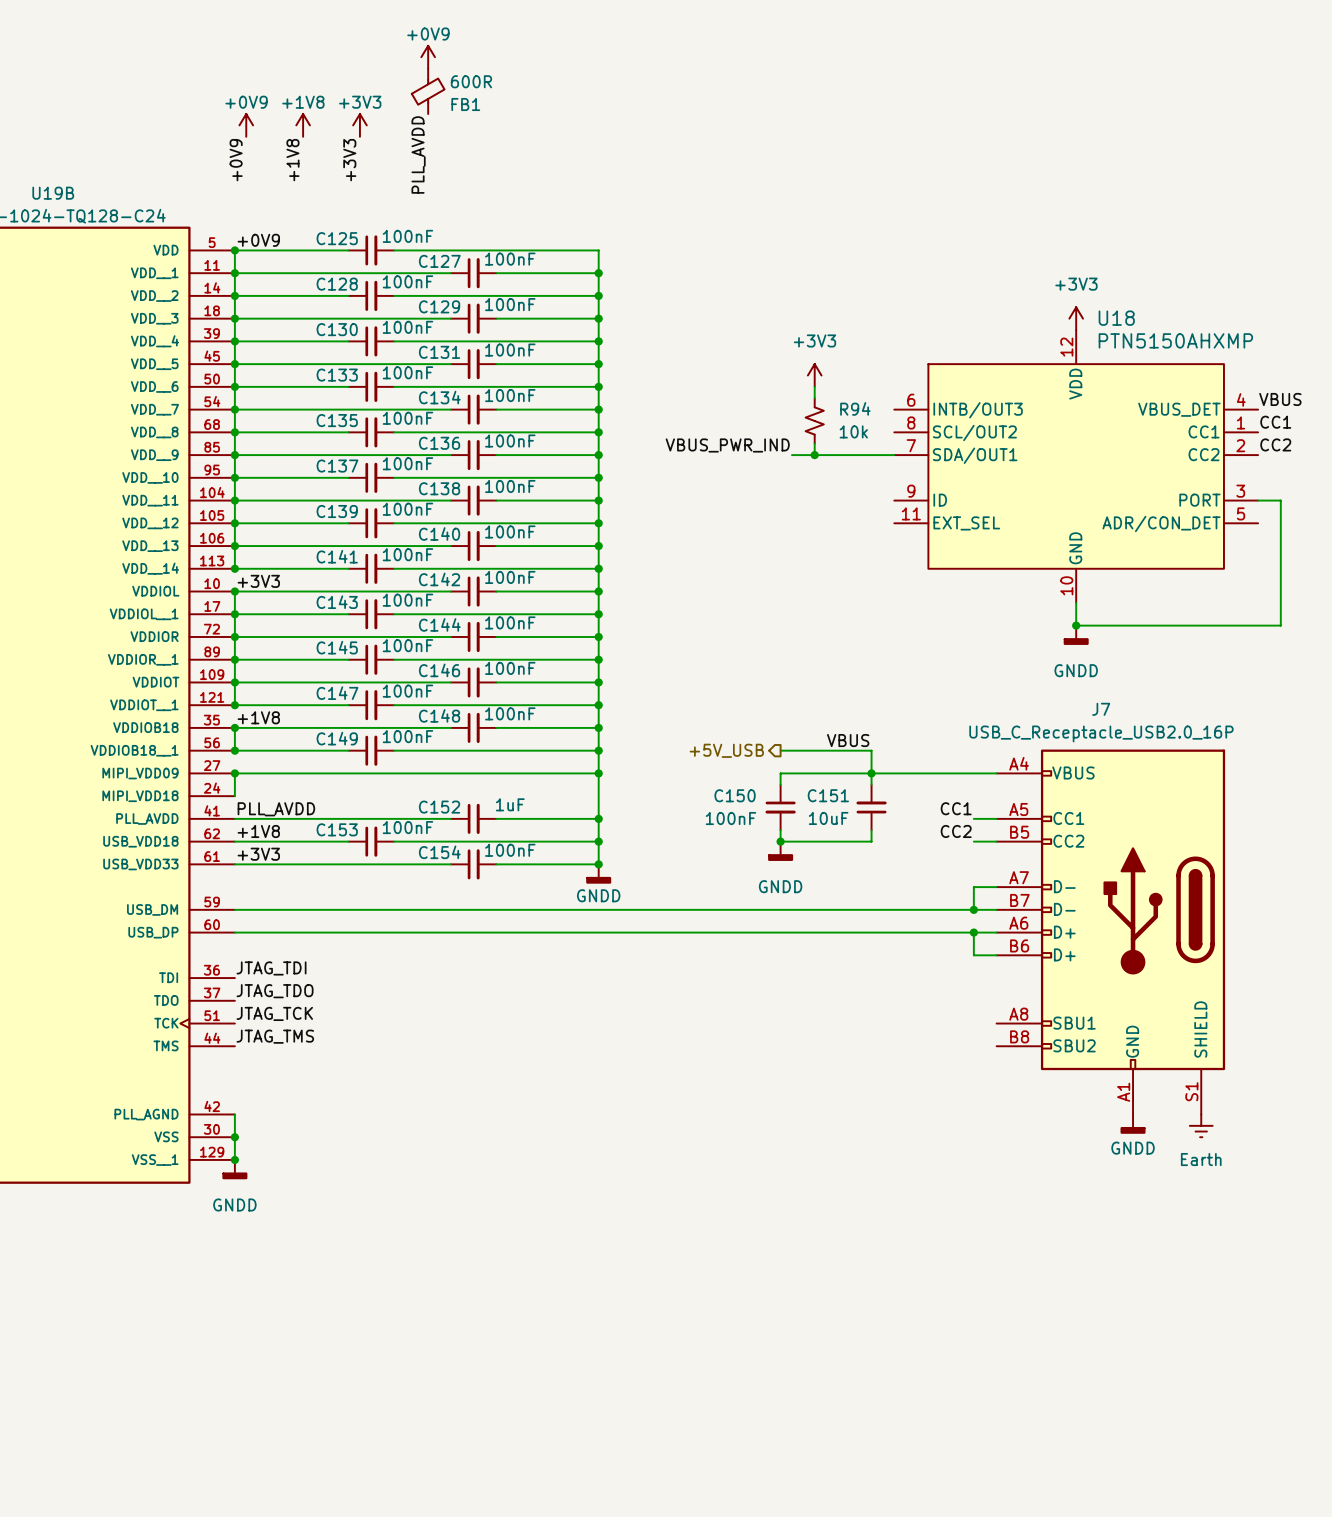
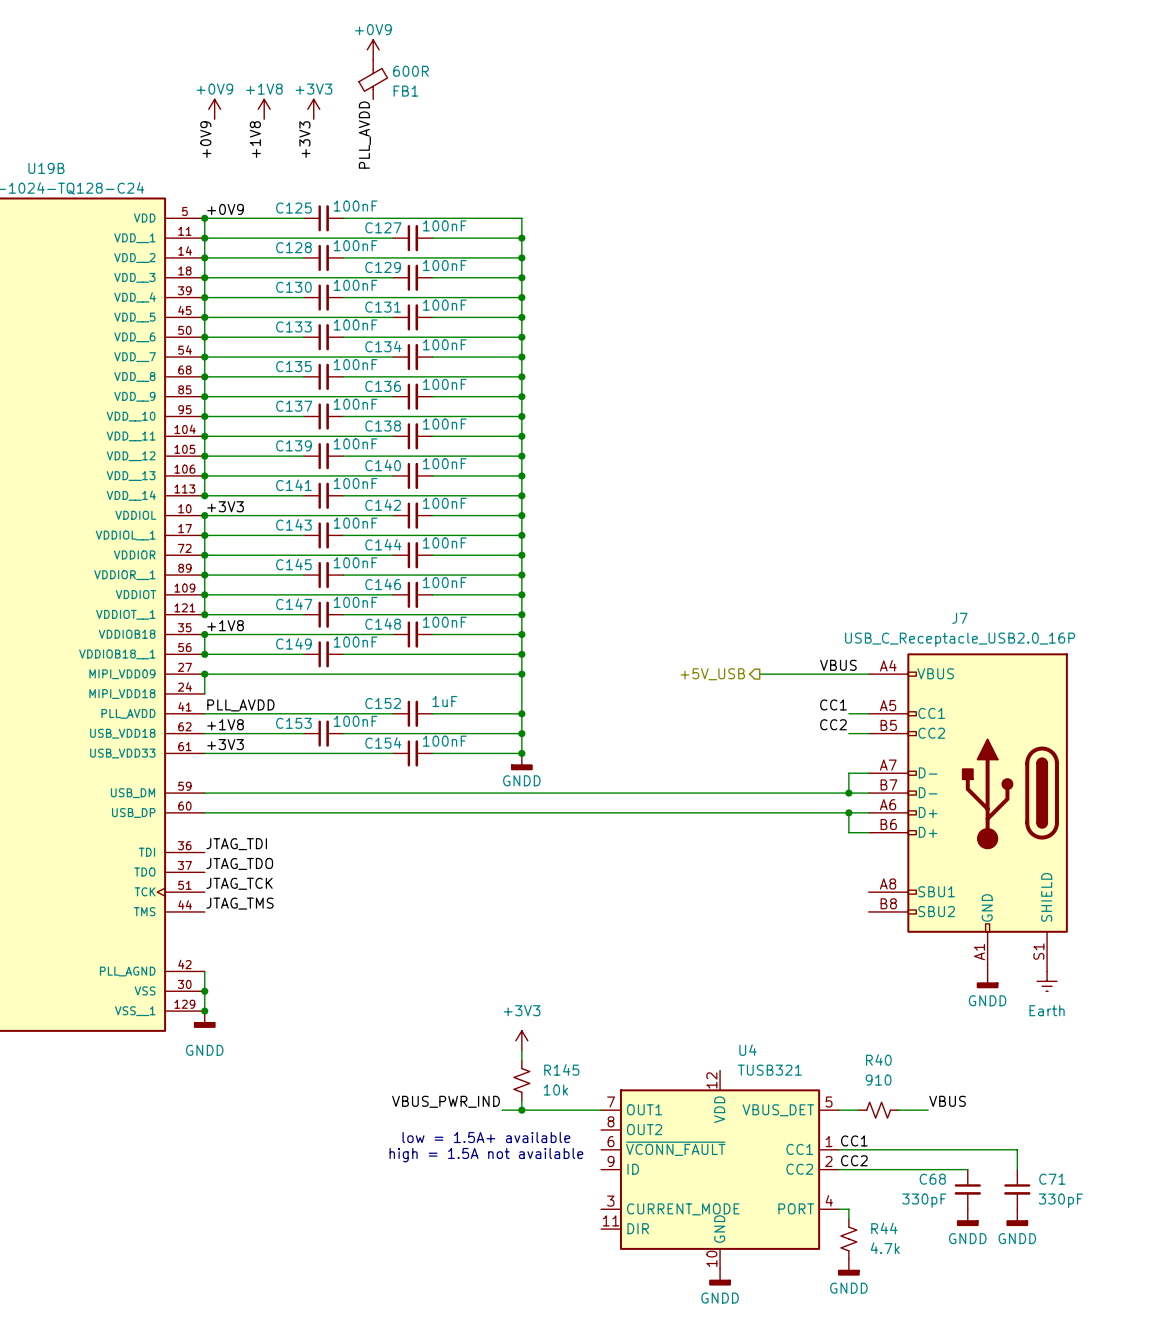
power symbol: +3V3 (1076, 318) -> none
power symbol: +3V3 (814, 375) -> none
wire: (814, 386) (814, 398) -> none
label: VBUS (1280, 399) -> none
R94: 10k (814, 420) -> none
label: CC1 (1275, 422) -> none
wire: (814, 443) (814, 455) -> none
label: CC2 (1275, 444) -> none
label: VBUS_PWR_IND (727, 445) -> none
wire: (791, 455) (894, 455) -> none
junction: (814, 455) -> none
U18: PTN5150AHXMP (1076, 466) -> none
wire: (1258, 500) (1280, 500) (1280, 625) (1076, 625) (1076, 602) -> none
junction: (1076, 625) -> none
power symbol: GNDD (1076, 635) -> none
label position: VBUS (848, 740) -> VBUS (838, 665)
hierarchical label position: +5V_USB (726, 750) -> +5V_USB (712, 674)
wire: (780, 750) (871, 750) (871, 784) -> none
wire: (871, 773) (780, 773) (780, 784) -> none
junction: (871, 773) -> none
C150: 100nF (780, 807) -> none
C151: 10uF (871, 807) -> none
wire: (780, 830) (780, 841) (871, 841) (871, 830) -> none
junction: (780, 841) -> none
power symbol: GNDD (780, 851) -> none
power symbol: none -> +3V3 (521, 1040)
wire: none -> (521, 1050) (521, 1060)
R145: none -> 10k (521, 1080)
wire: none -> (521, 1100) (521, 1110)
label: none -> VBUS (947, 1101)
label: none -> VBUS_PWR_IND (446, 1101)
wire: none -> (502, 1110) (601, 1110)
junction: none -> (521, 1110)
wire: none -> (838, 1110) (858, 1110)
R40: none -> 910 (878, 1110)
wire: none -> (898, 1110) (928, 1110)
text: none -> low = 1.5A+ available (486, 1137)
label: none -> CC1 (854, 1140)
wire: none -> (838, 1149) (1017, 1149) (1017, 1169)
text: none -> high = 1.5A not available (486, 1155)
label: none -> CC2 (854, 1160)
U4: none -> TUSB321 (720, 1169)
wire: none -> (838, 1169) (967, 1169)
C68: none -> 330pF (967, 1189)
C71: none -> 330pF (1017, 1189)
wire: none -> (838, 1209) (848, 1209) (848, 1219)
power symbol: none -> GNDD (967, 1217)
power symbol: none -> GNDD (1017, 1217)
R44: none -> 4.7k (848, 1238)
power symbol: none -> GNDD (848, 1267)
power symbol: none -> GNDD (720, 1277)

